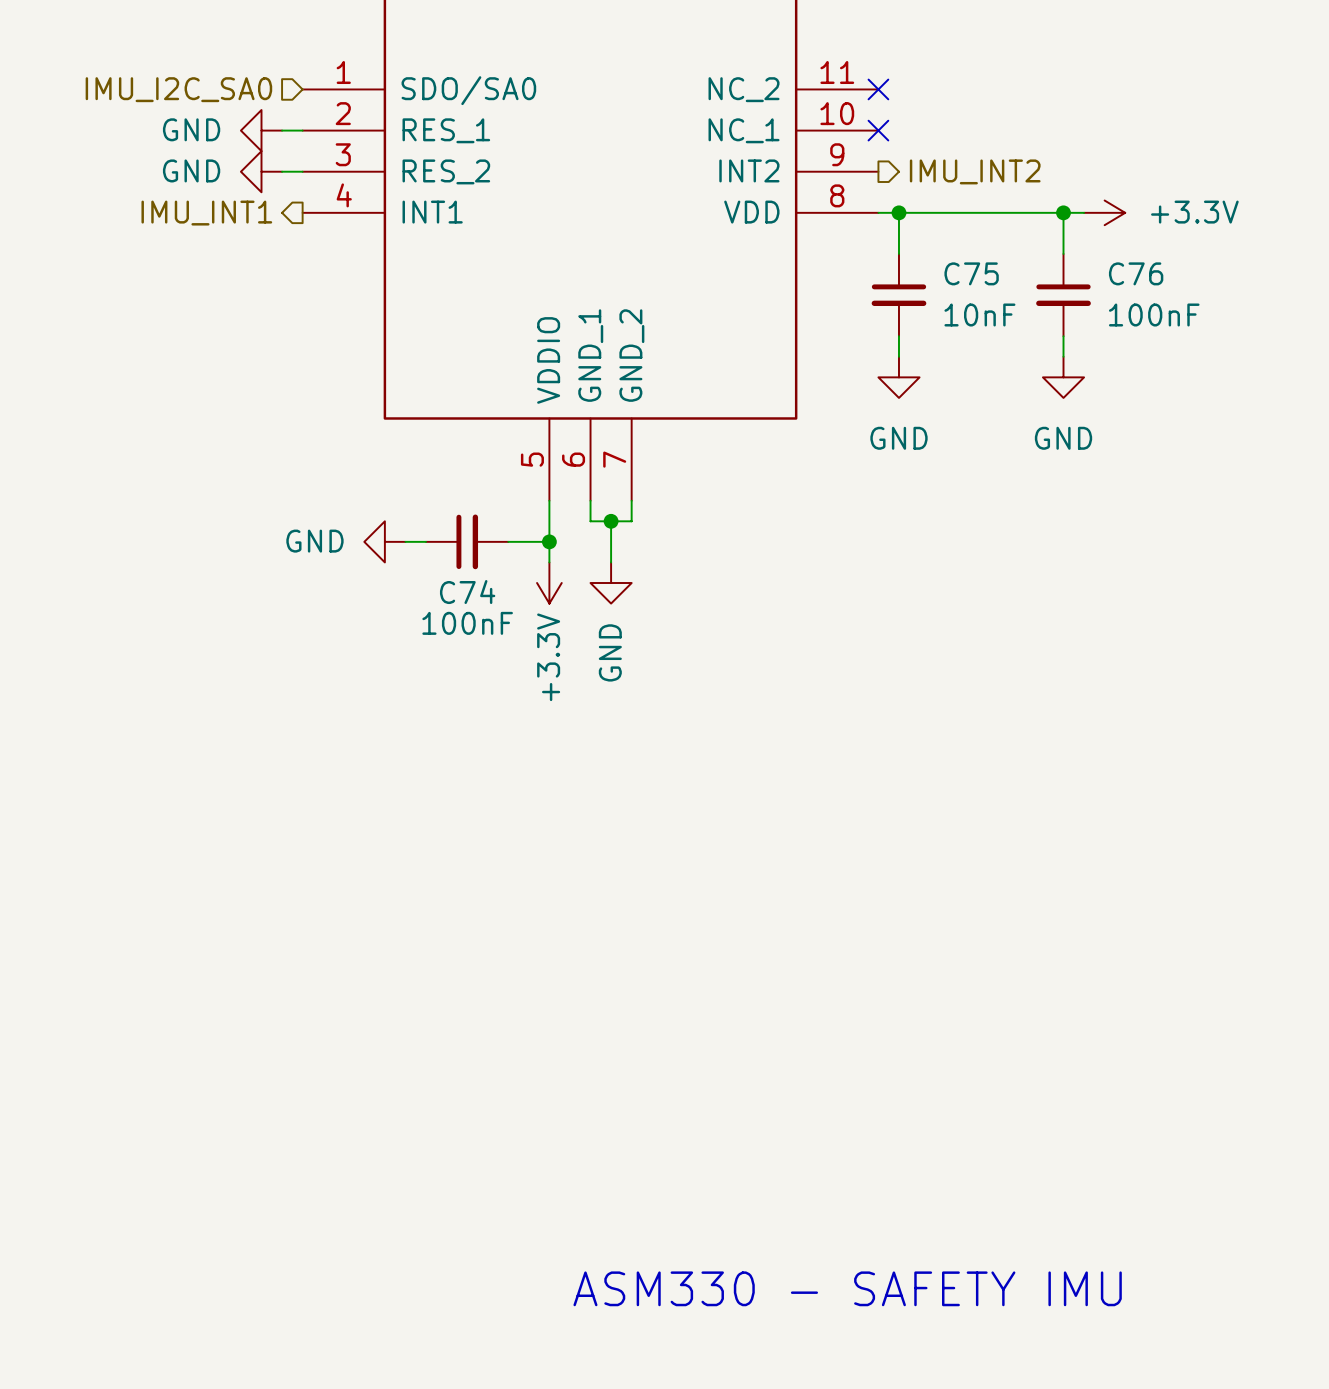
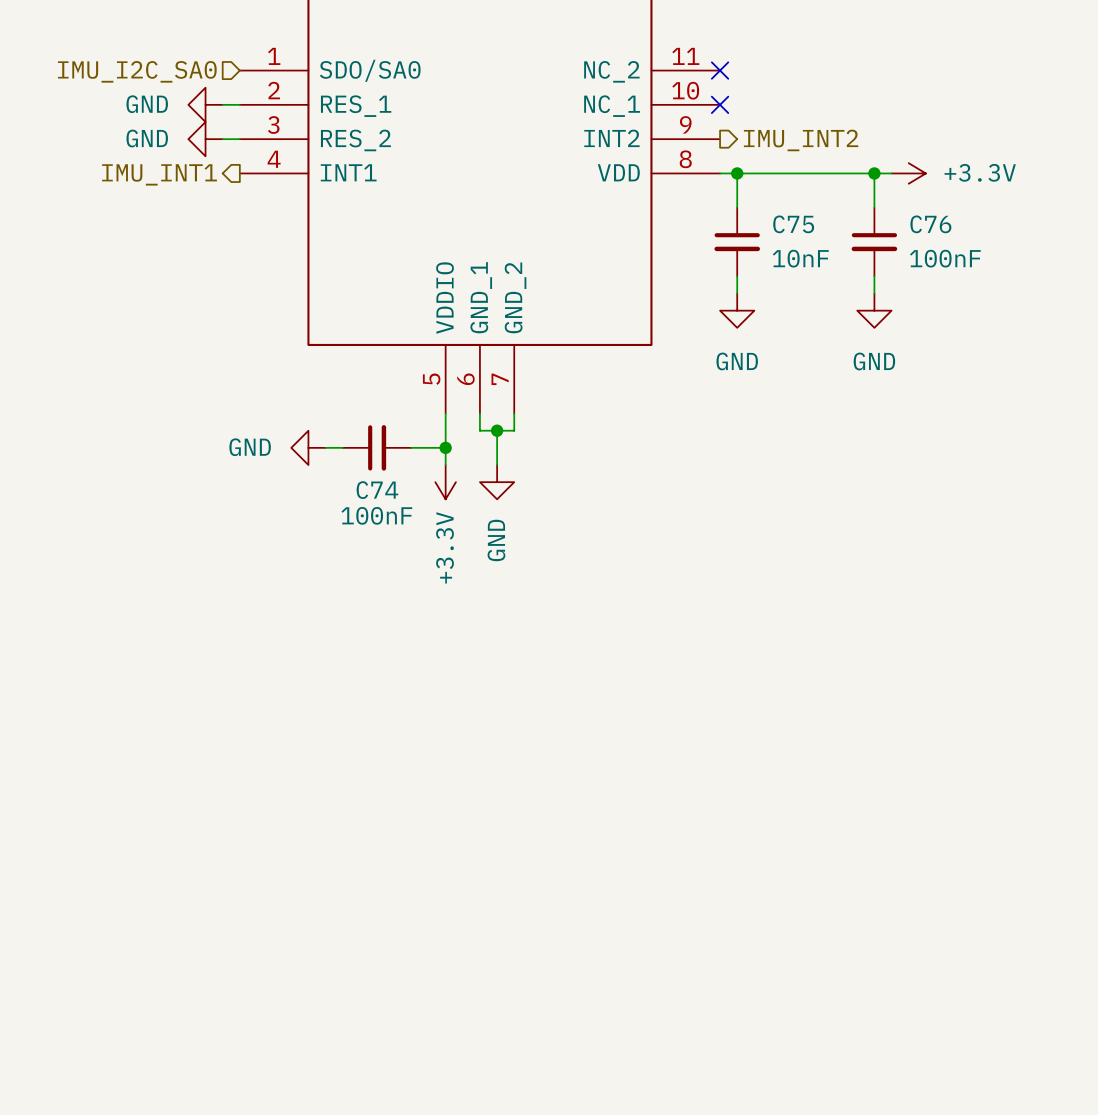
text: ASM330 - SAFETY IMU (847, 1288) -> none

